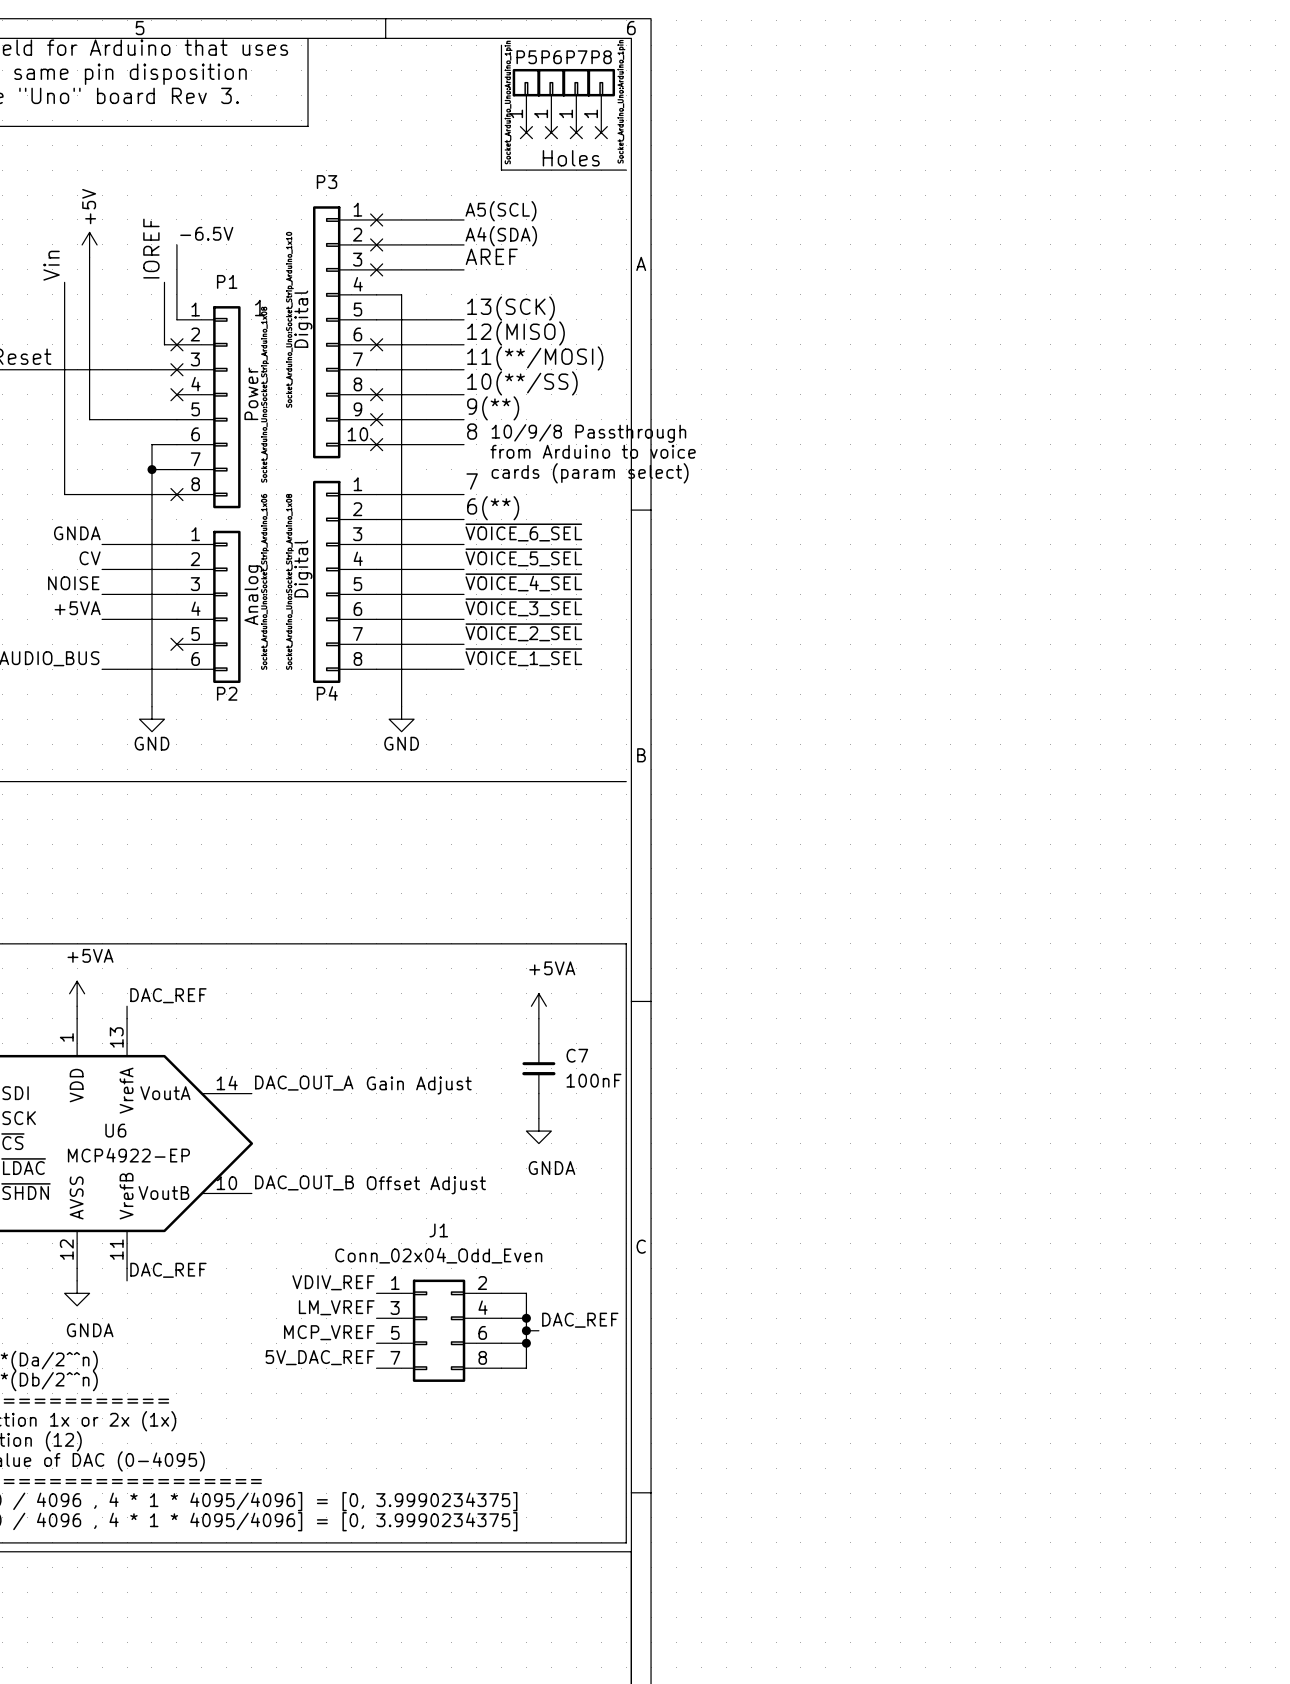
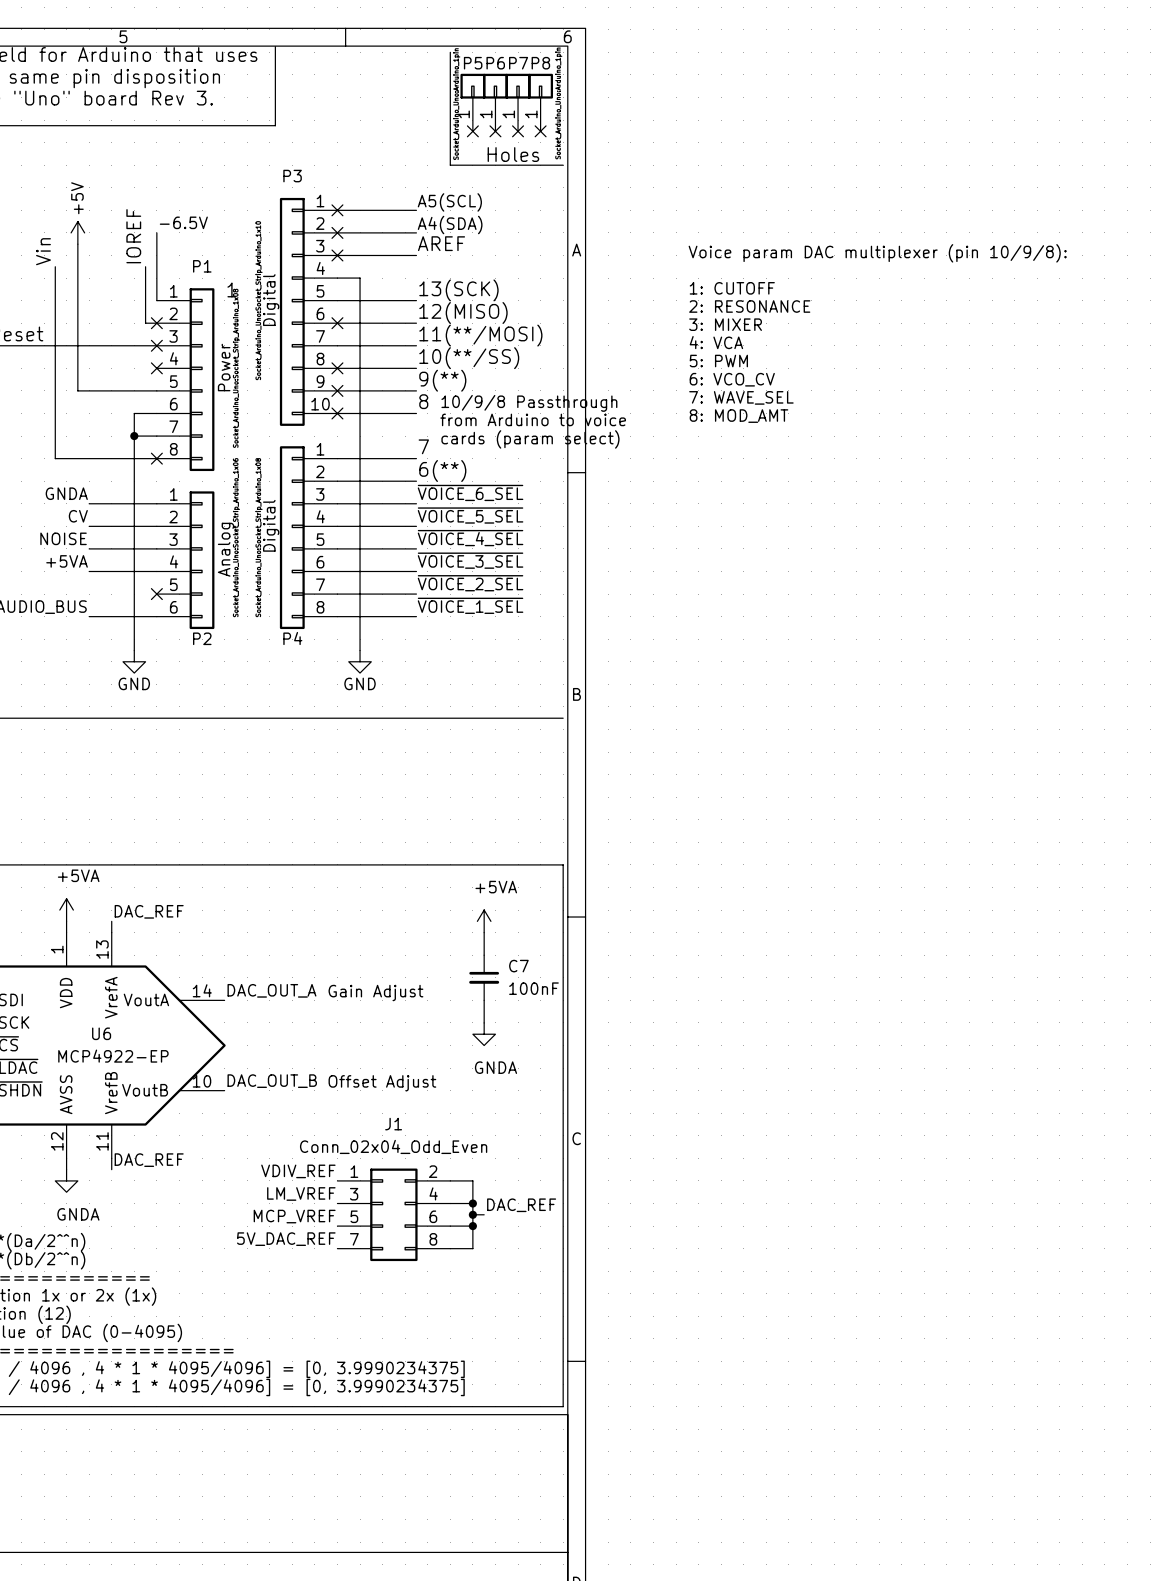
text: none -> Voice param DAC multiplexer (pin 10/9/8): (877, 253)
text: none -> 1: CUTOFF (732, 288)
text: none -> 2: RESONANCE (749, 306)
text: none -> 3: MIXER (725, 324)
text: none -> 4: VCA (716, 342)
text: none -> 5: PWM (718, 361)
text: none -> 6: VCO_CV (732, 379)
text: none -> 7: WAVE_SEL (741, 397)
text: none -> 8: MOD_AMT (738, 416)

